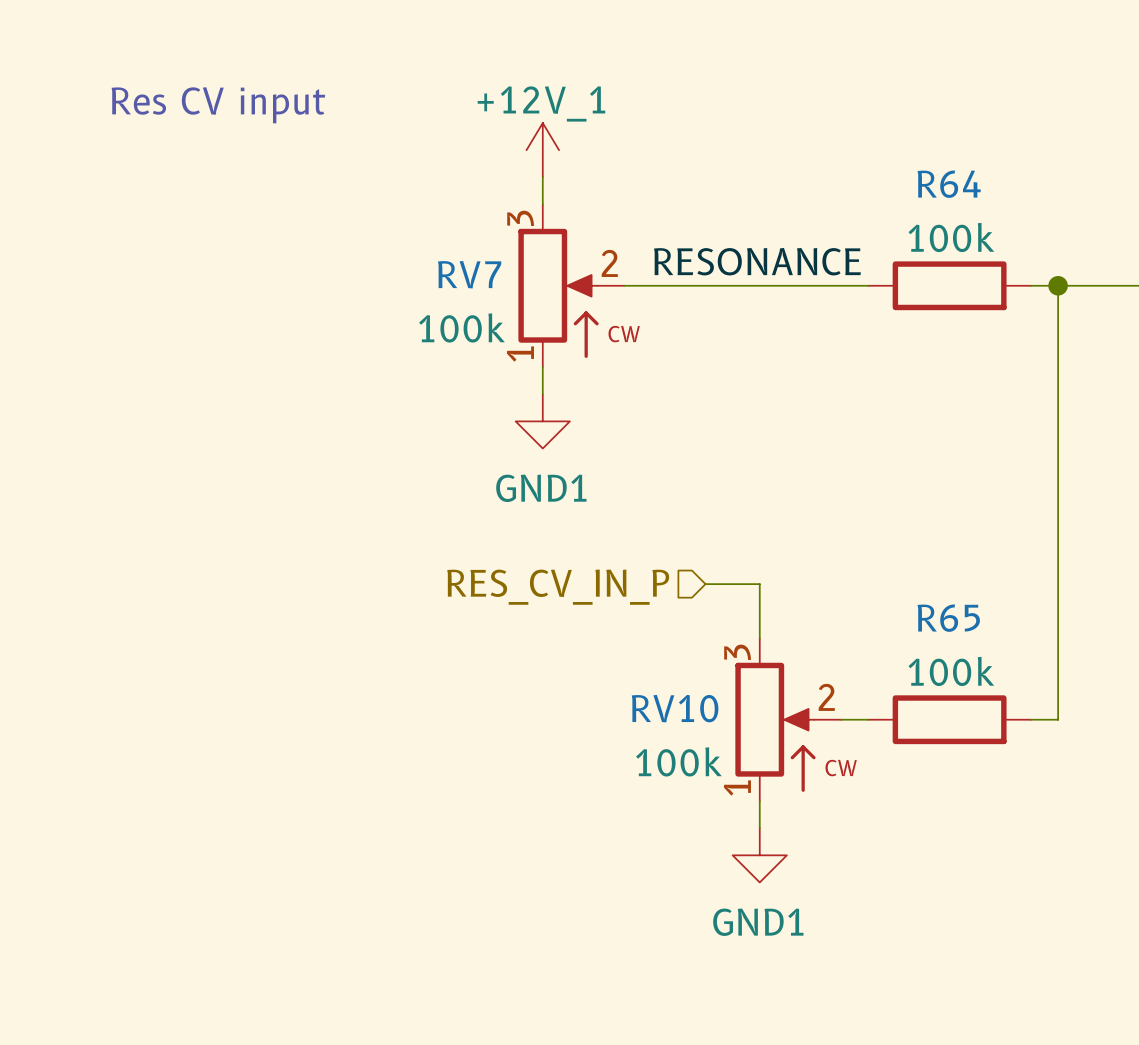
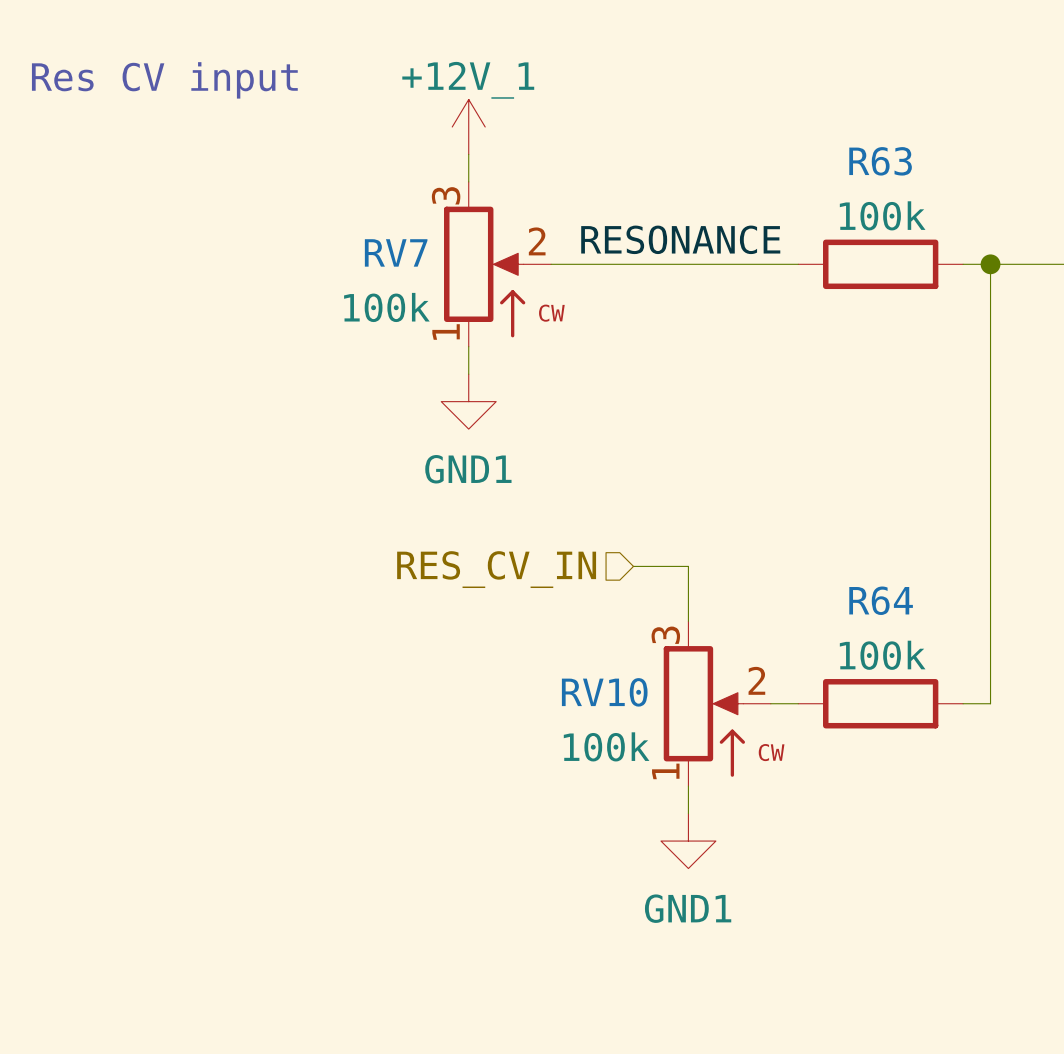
R64 name: R64 (949, 184) -> R63 (880, 161)
hierarchical label: RES_CV_IN_P (558, 587) -> RES_CV_IN (496, 569)
R65 name: R65 (948, 618) -> R64 (881, 600)

